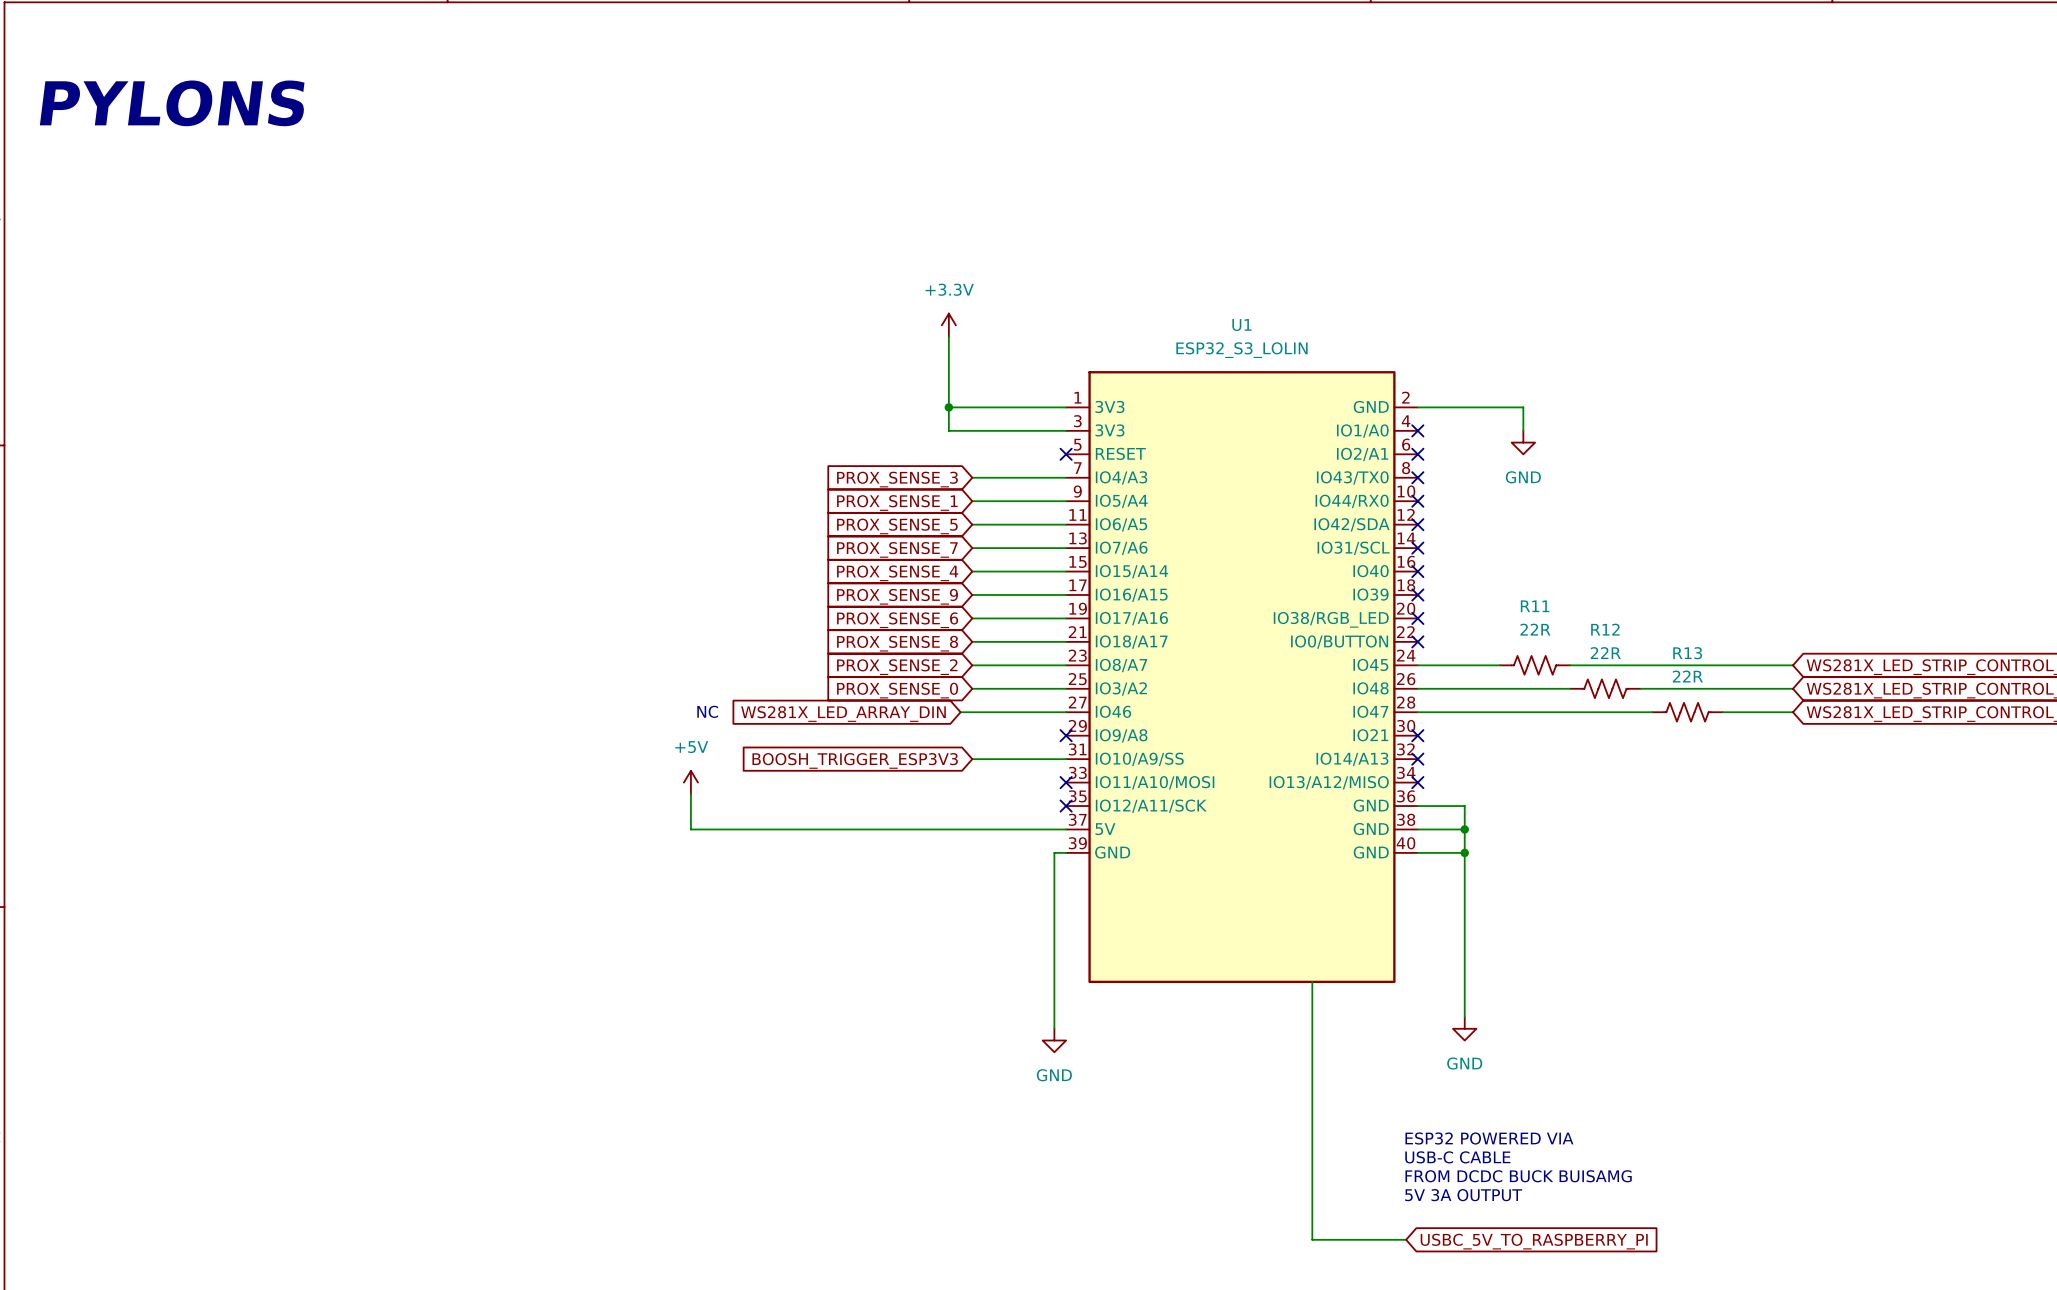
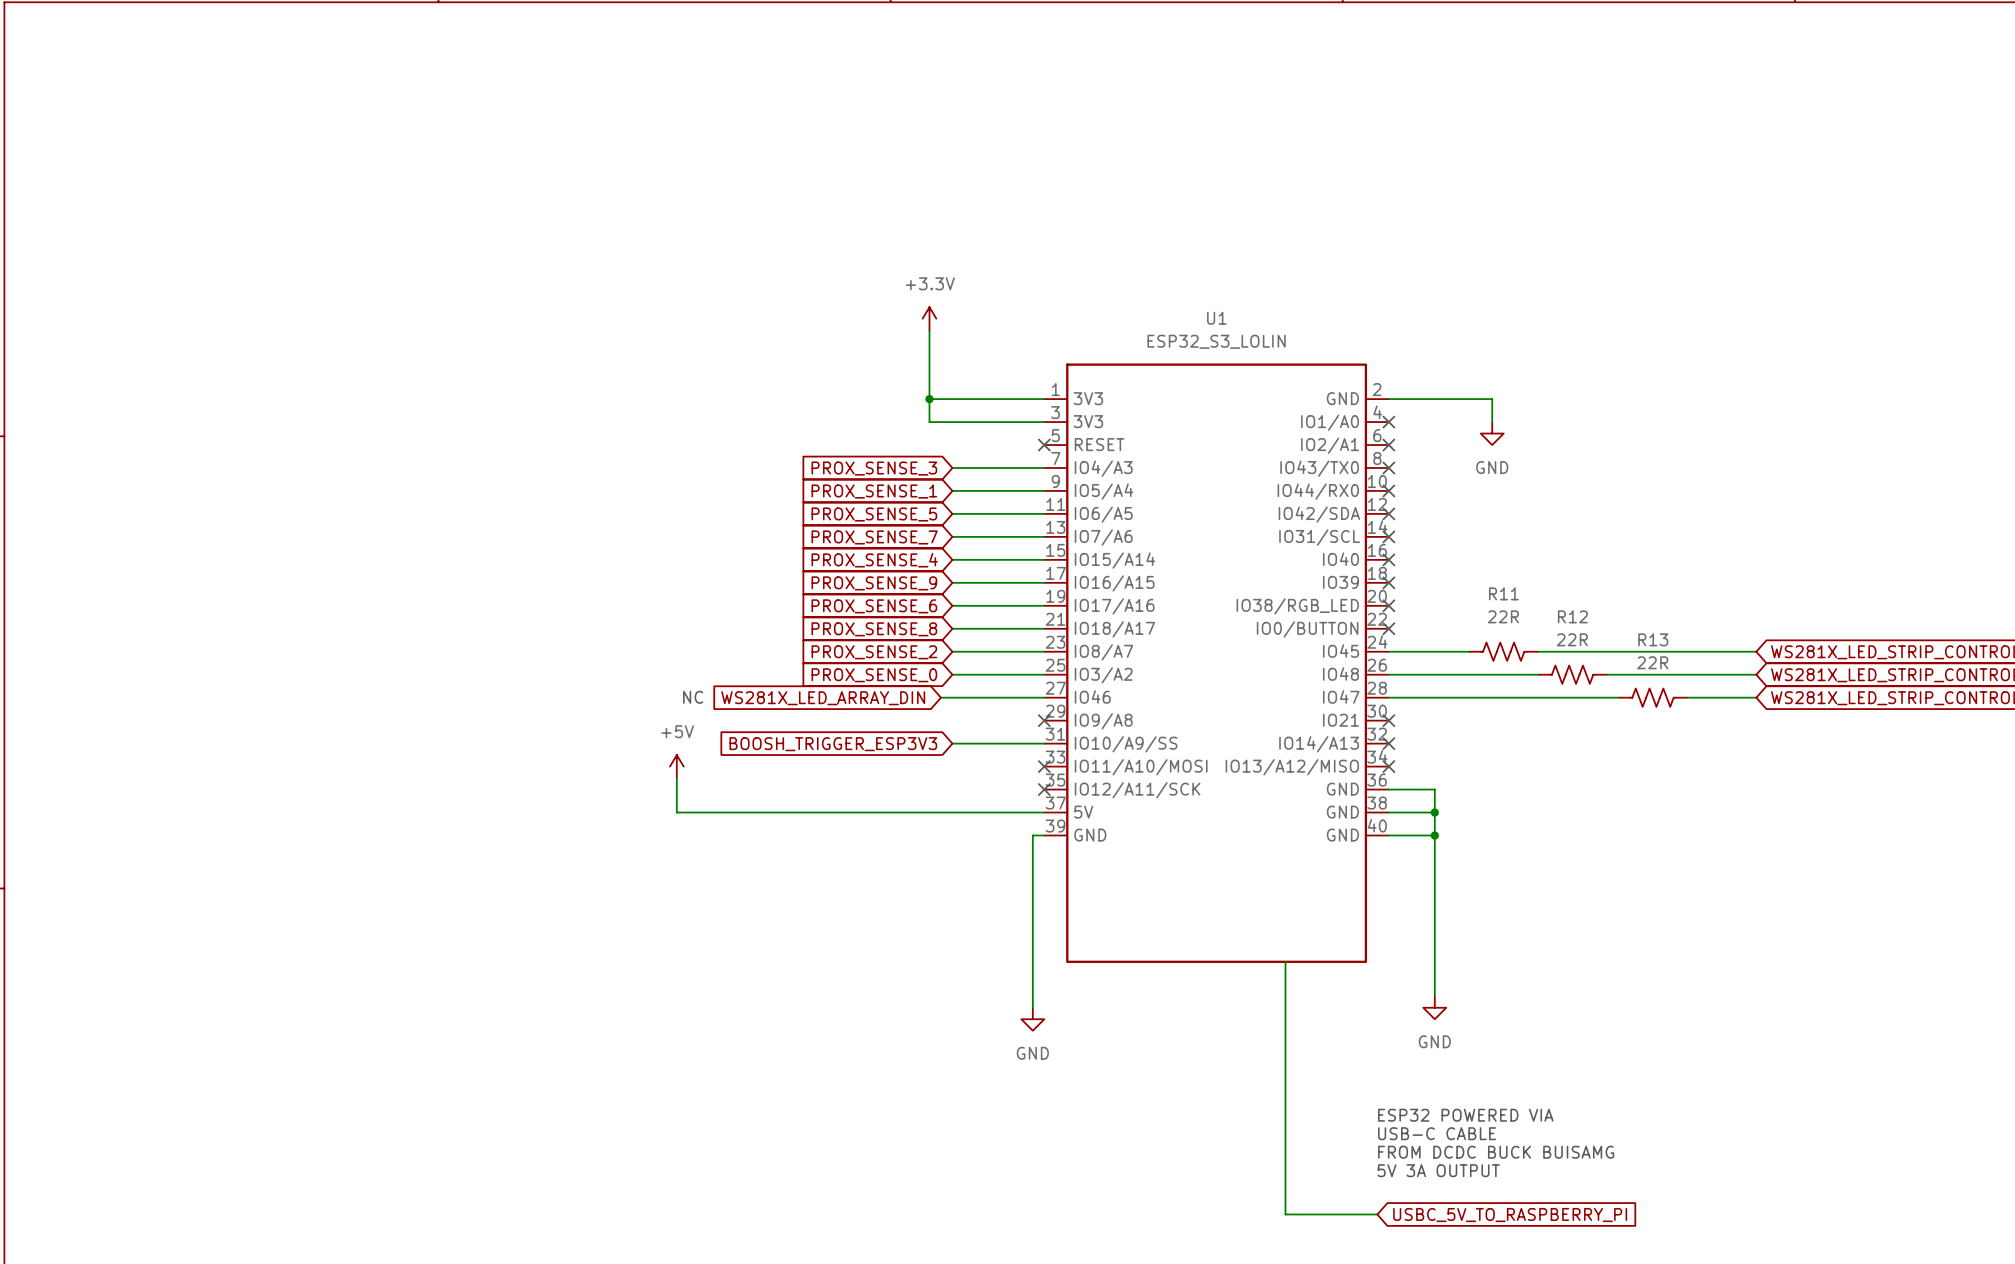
text: PYLONS (172, 103) -> none

